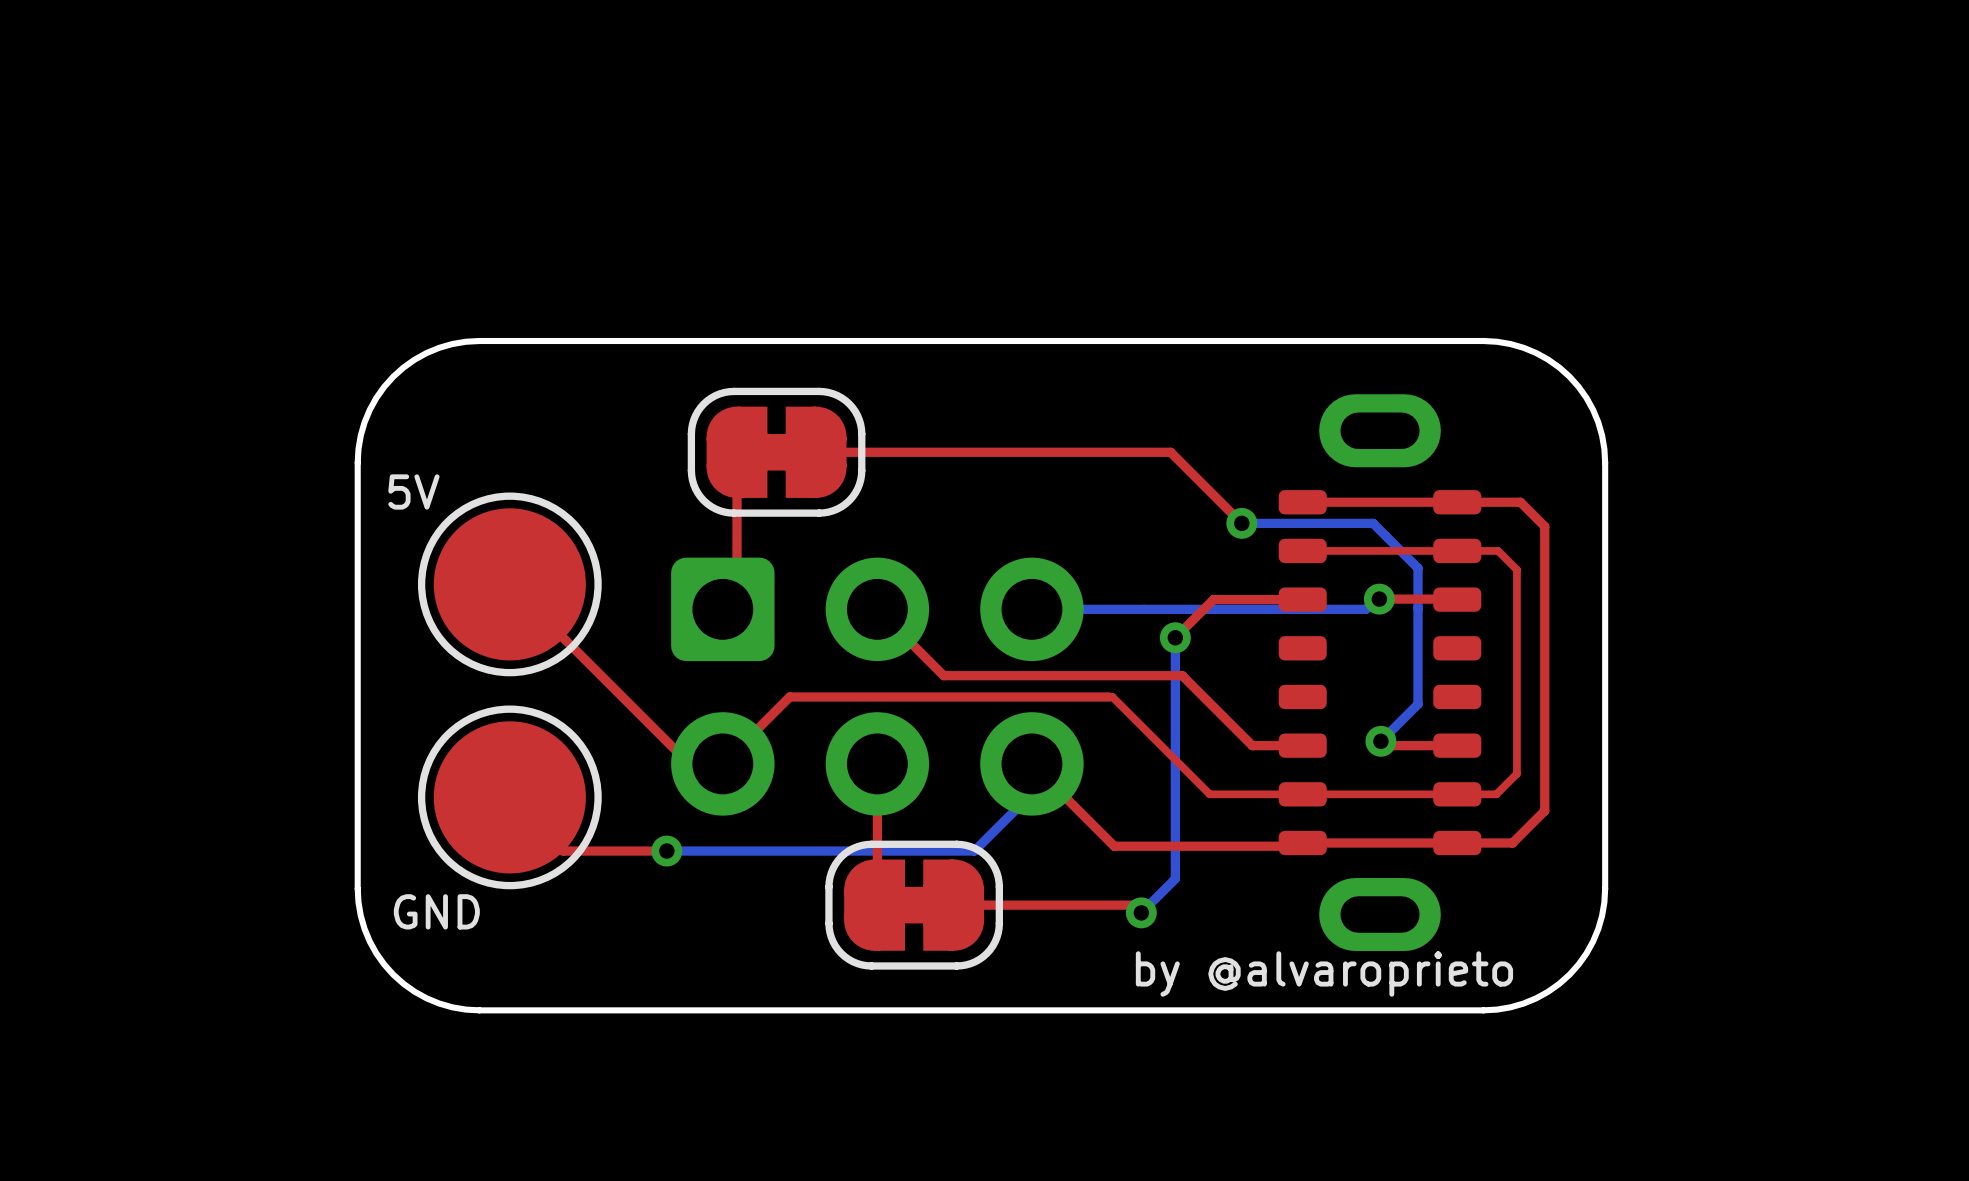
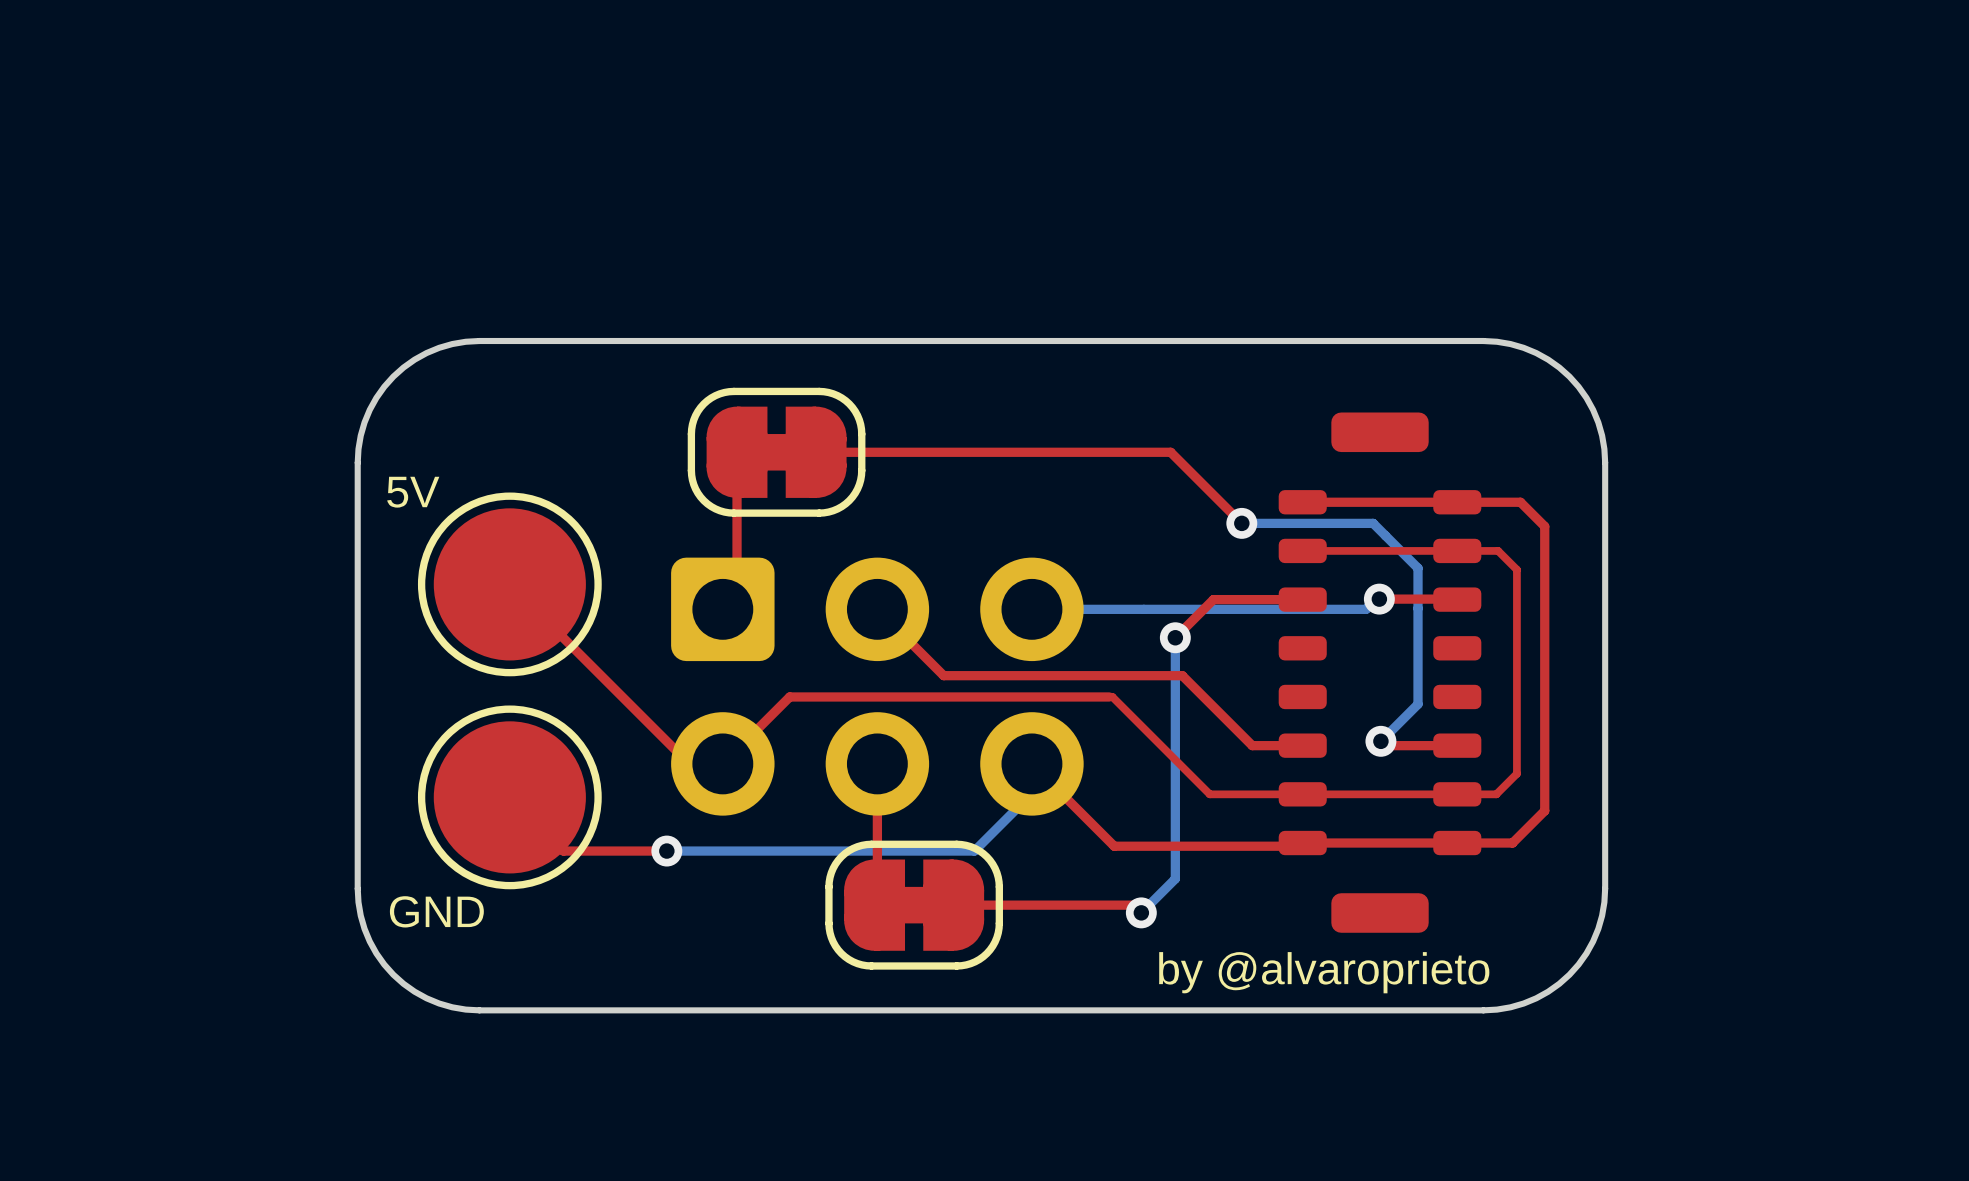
part footprint: [1278, 394, 1482, 952] -> [1278, 412, 1482, 933]

